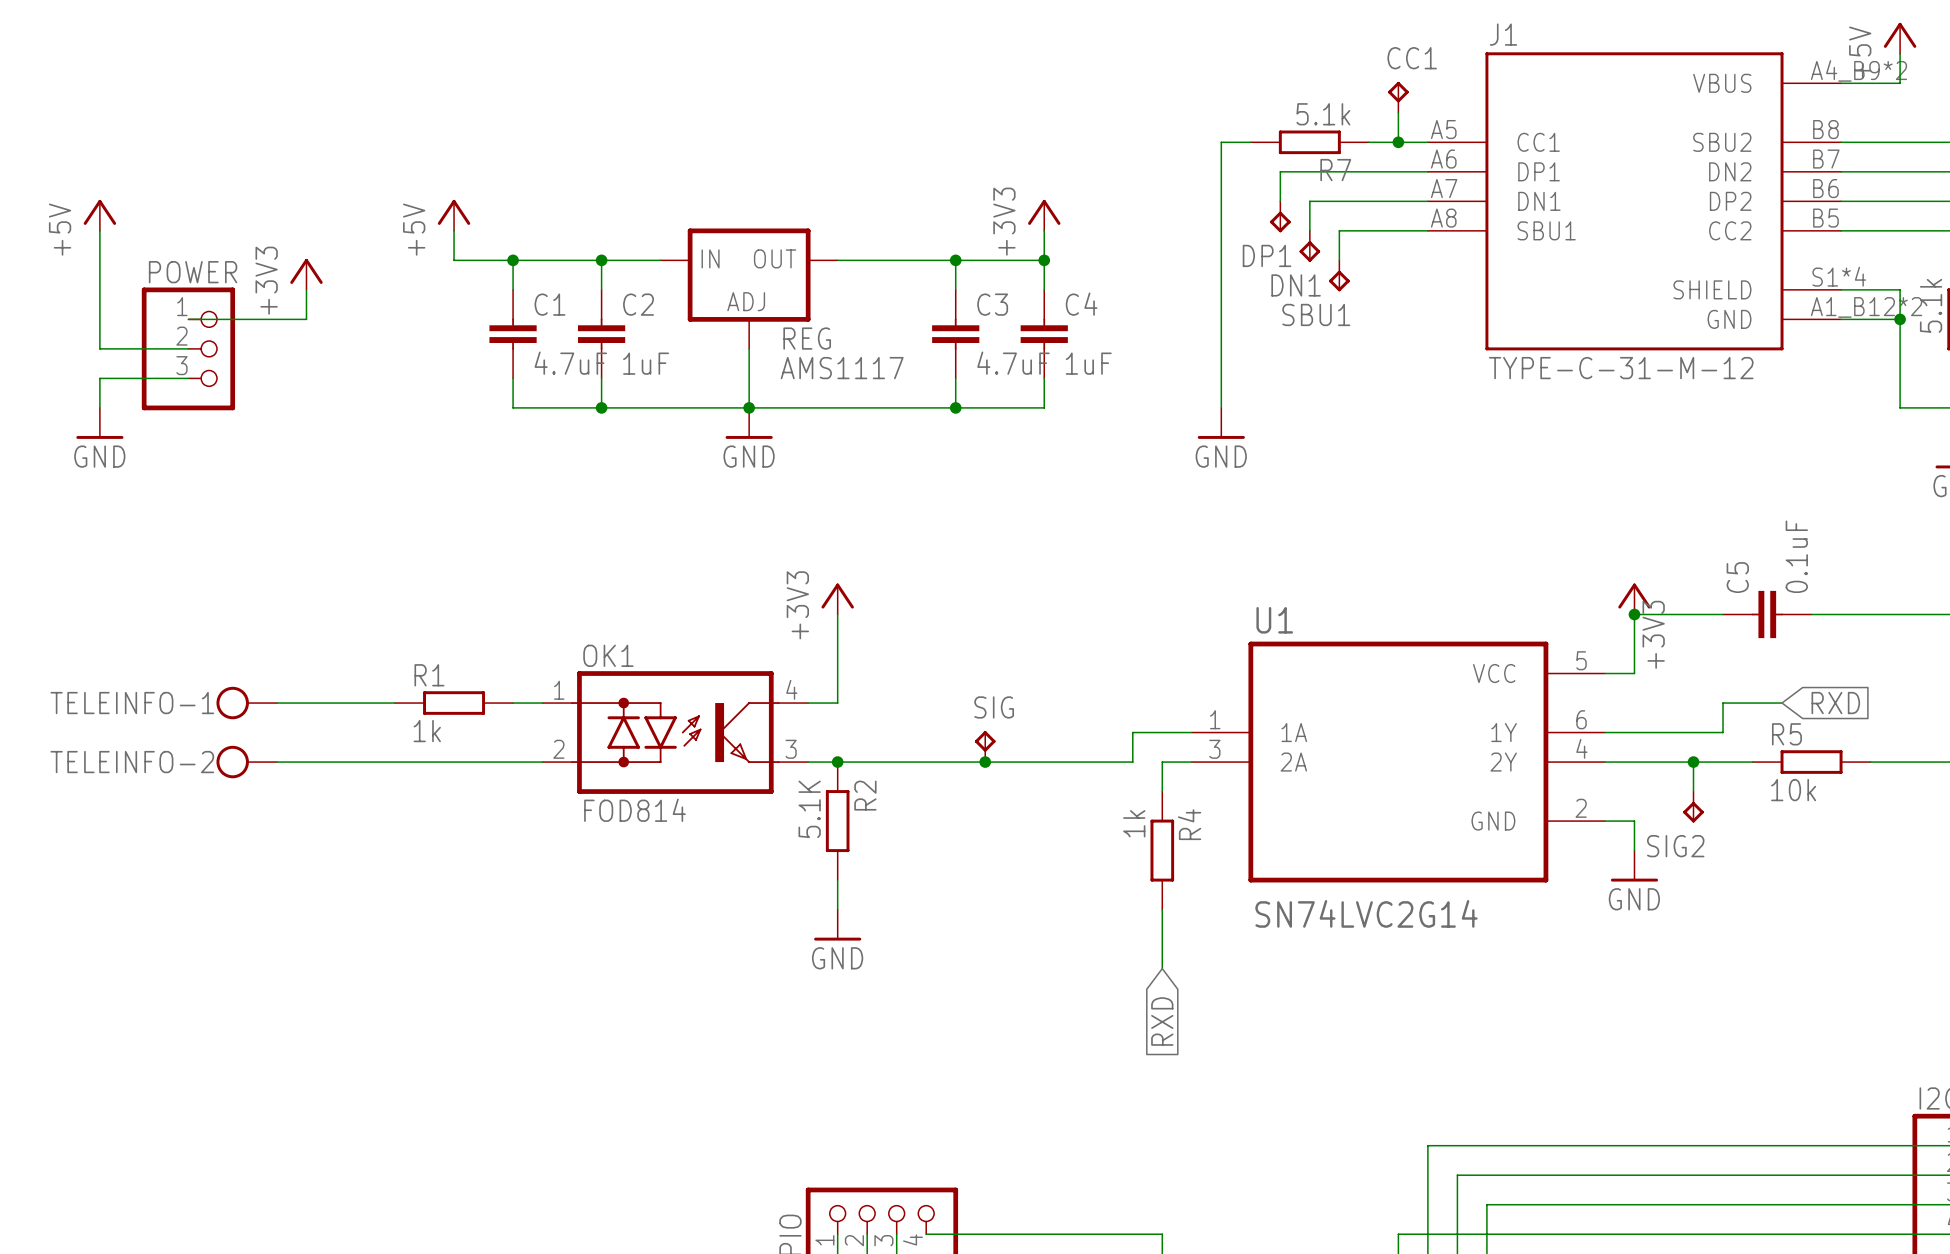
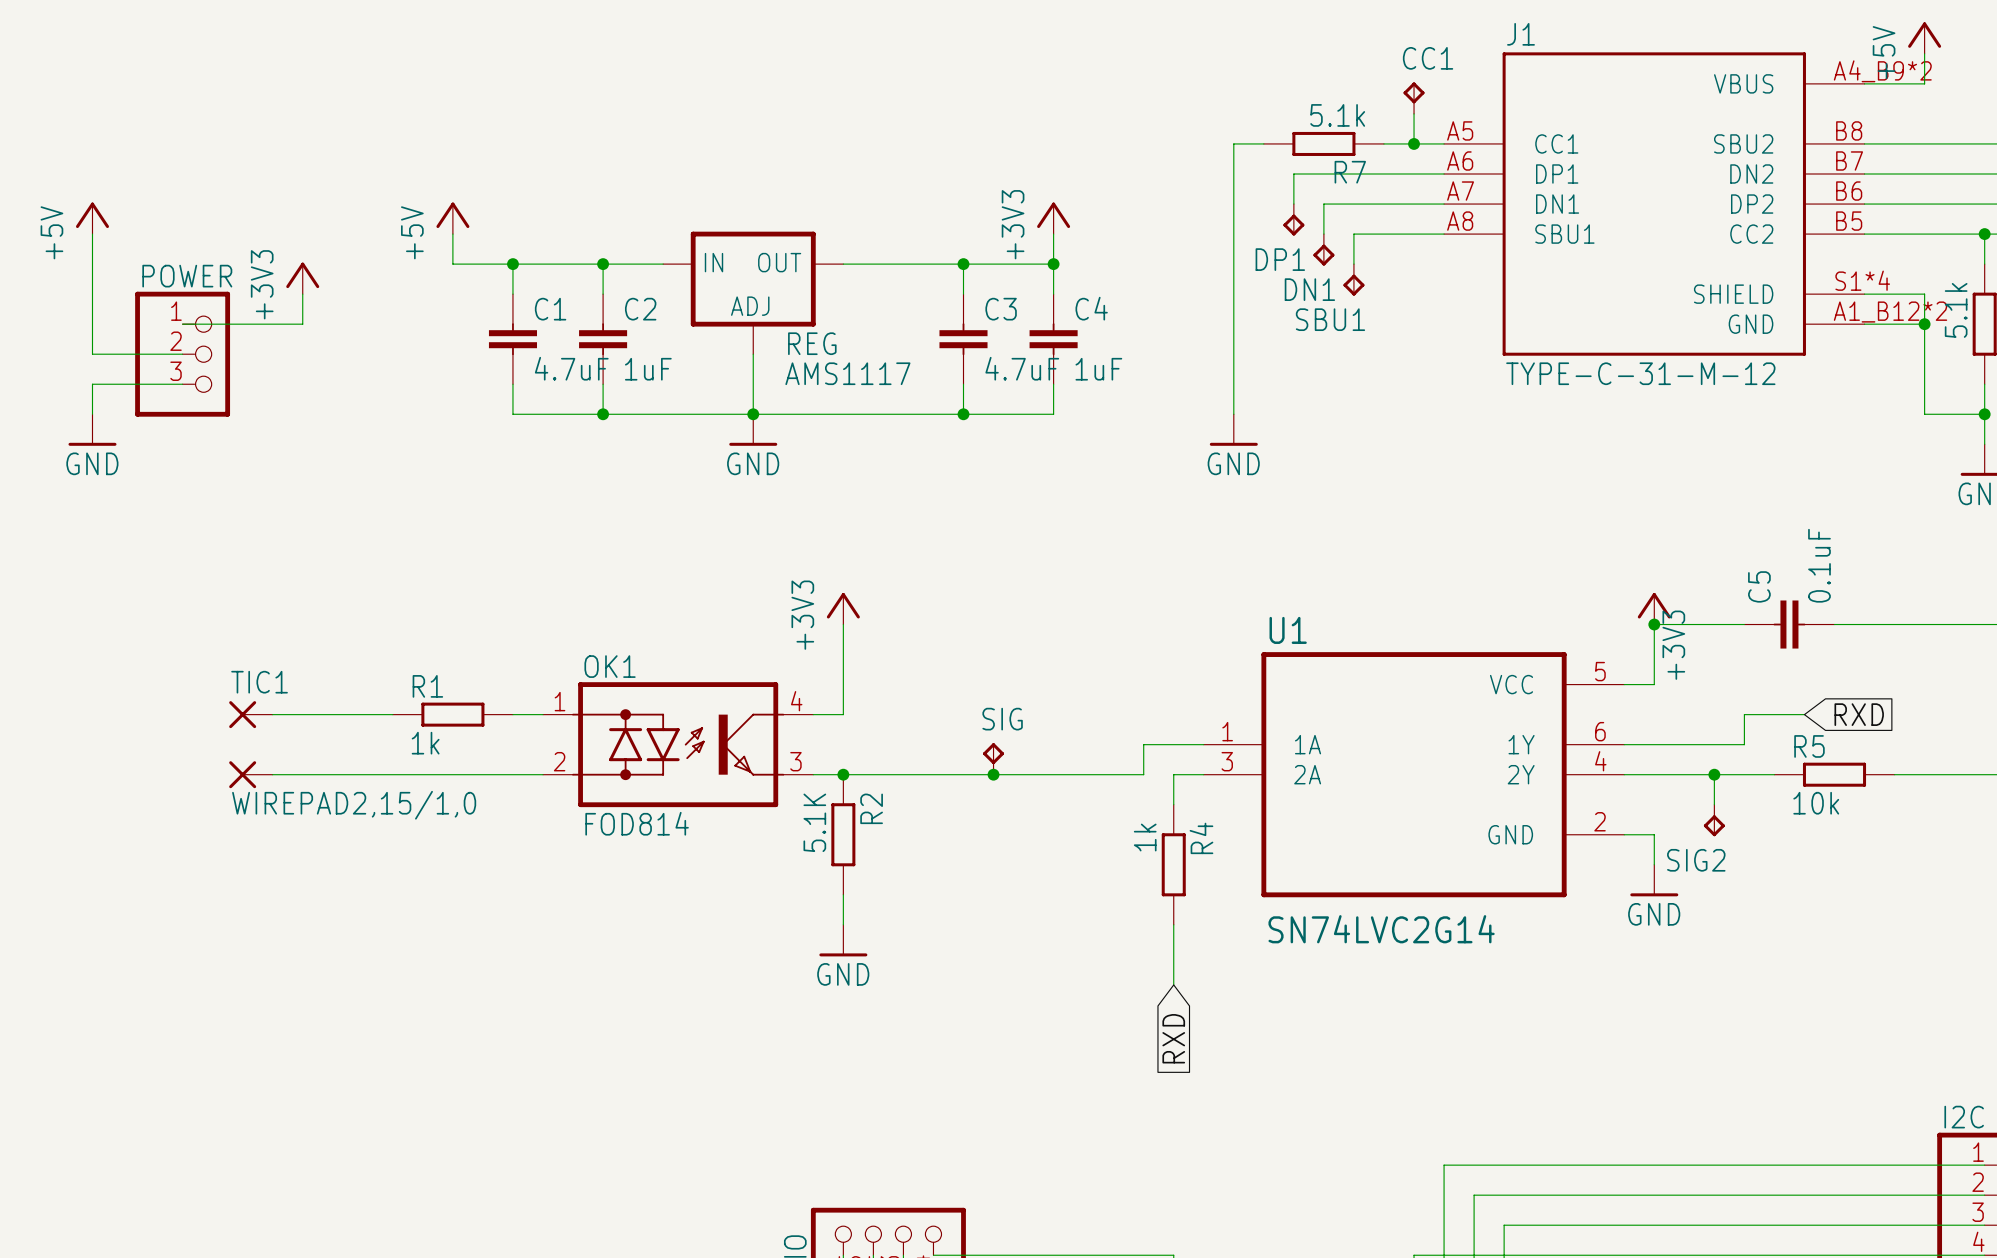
TELEINFO-1: (246, 703) -> none
TIC1: none -> (250, 714)
TELEINFO-2: (246, 762) -> none
part: none -> WIREPAD2,15/1,0 (250, 774)

